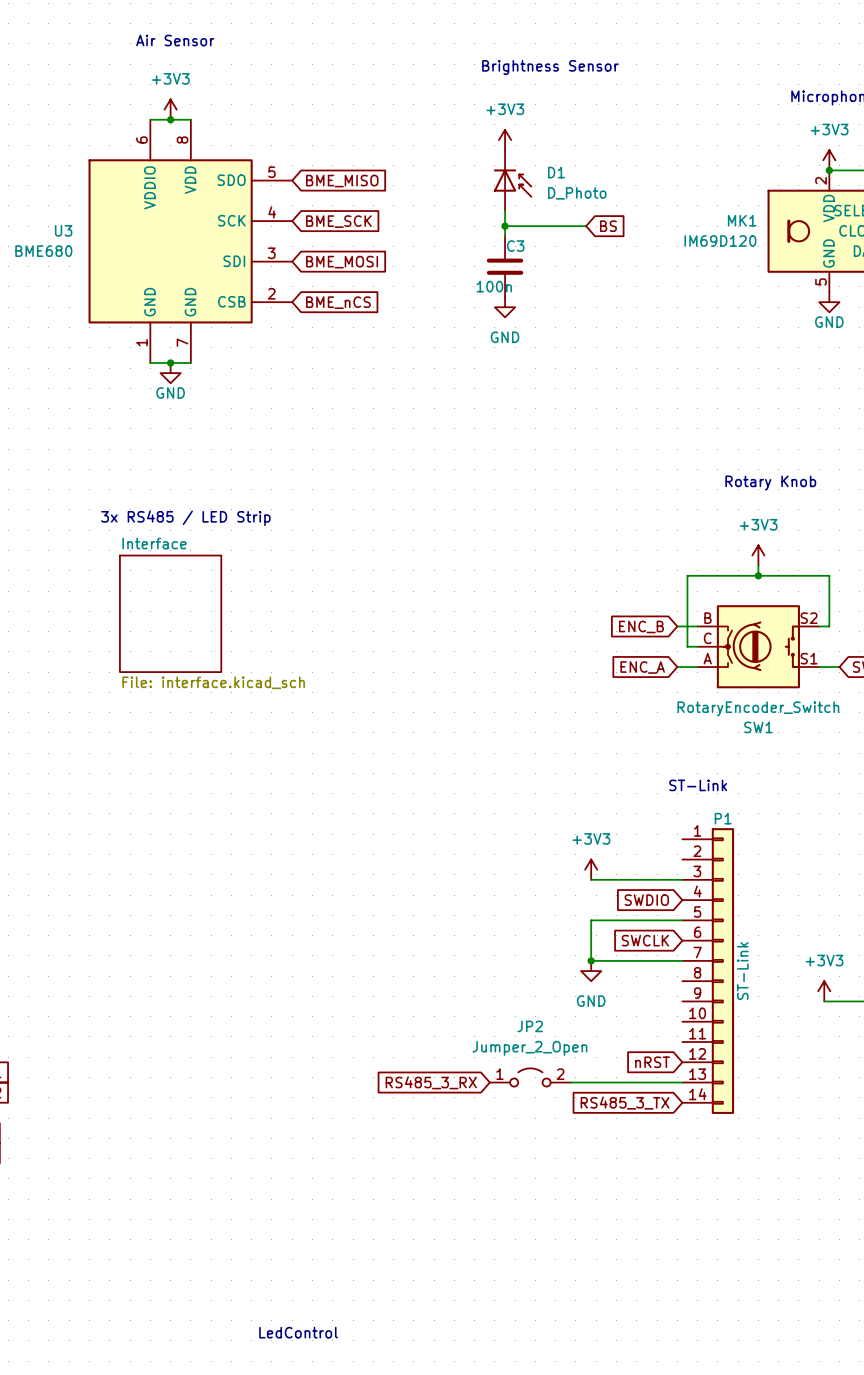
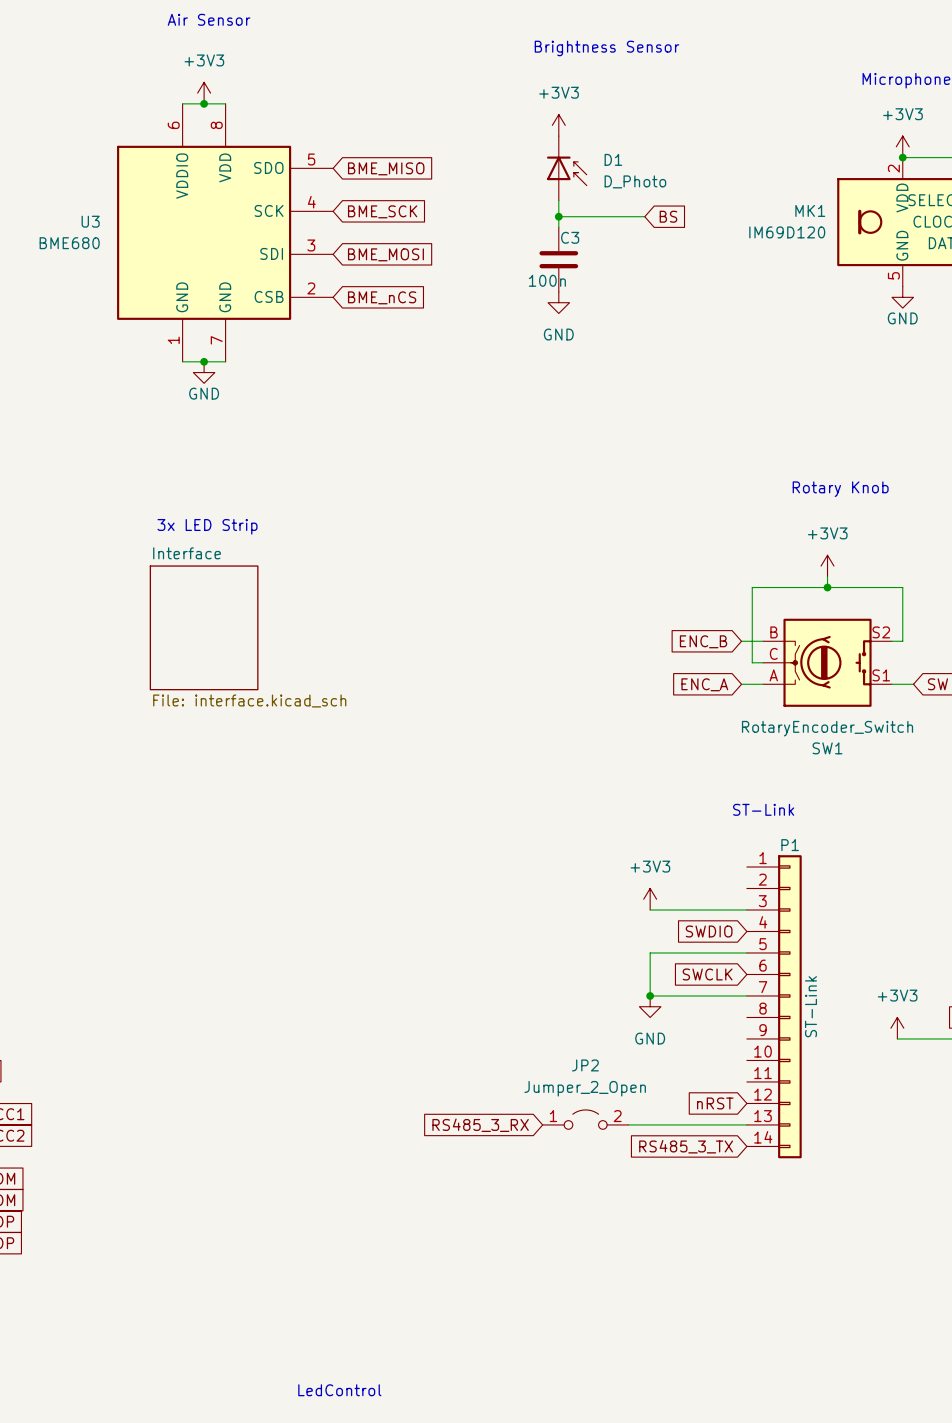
text: 3x RS485 / LED Strip (185, 518) -> 3x LED Strip (207, 526)

